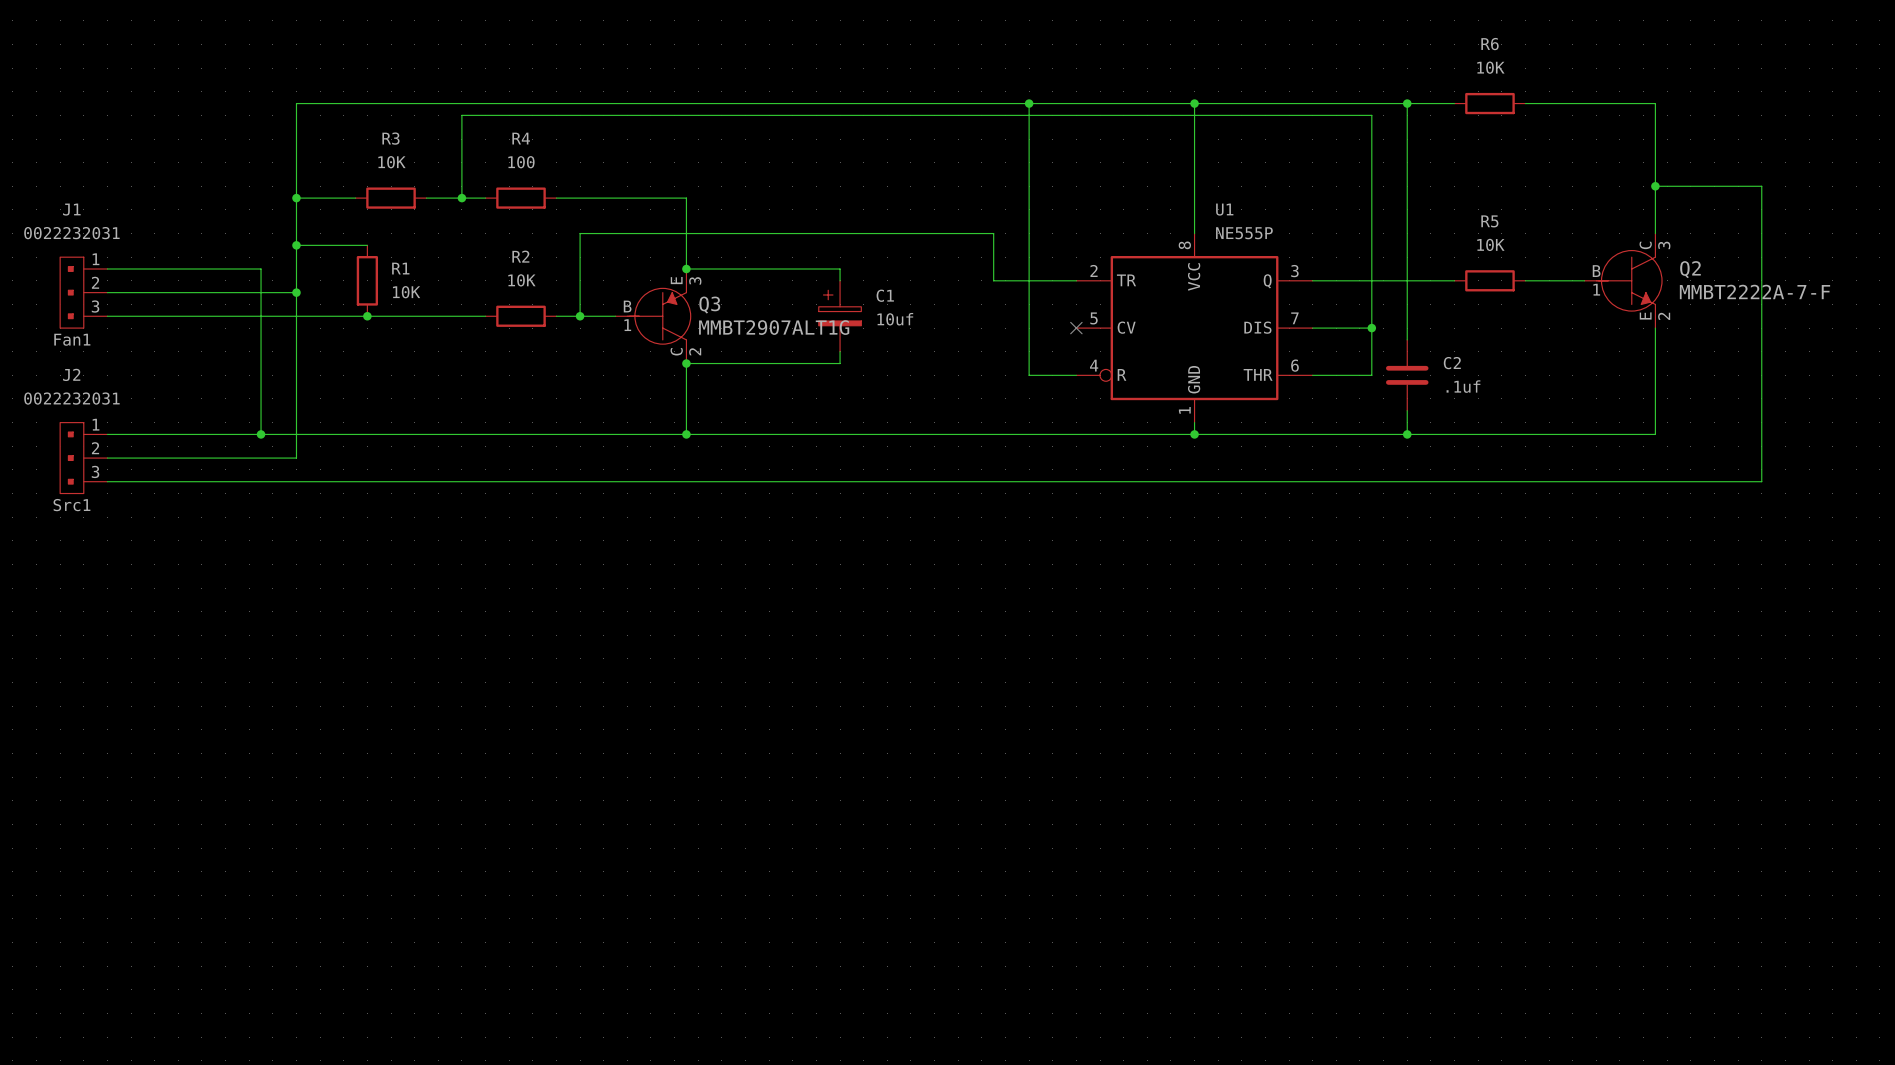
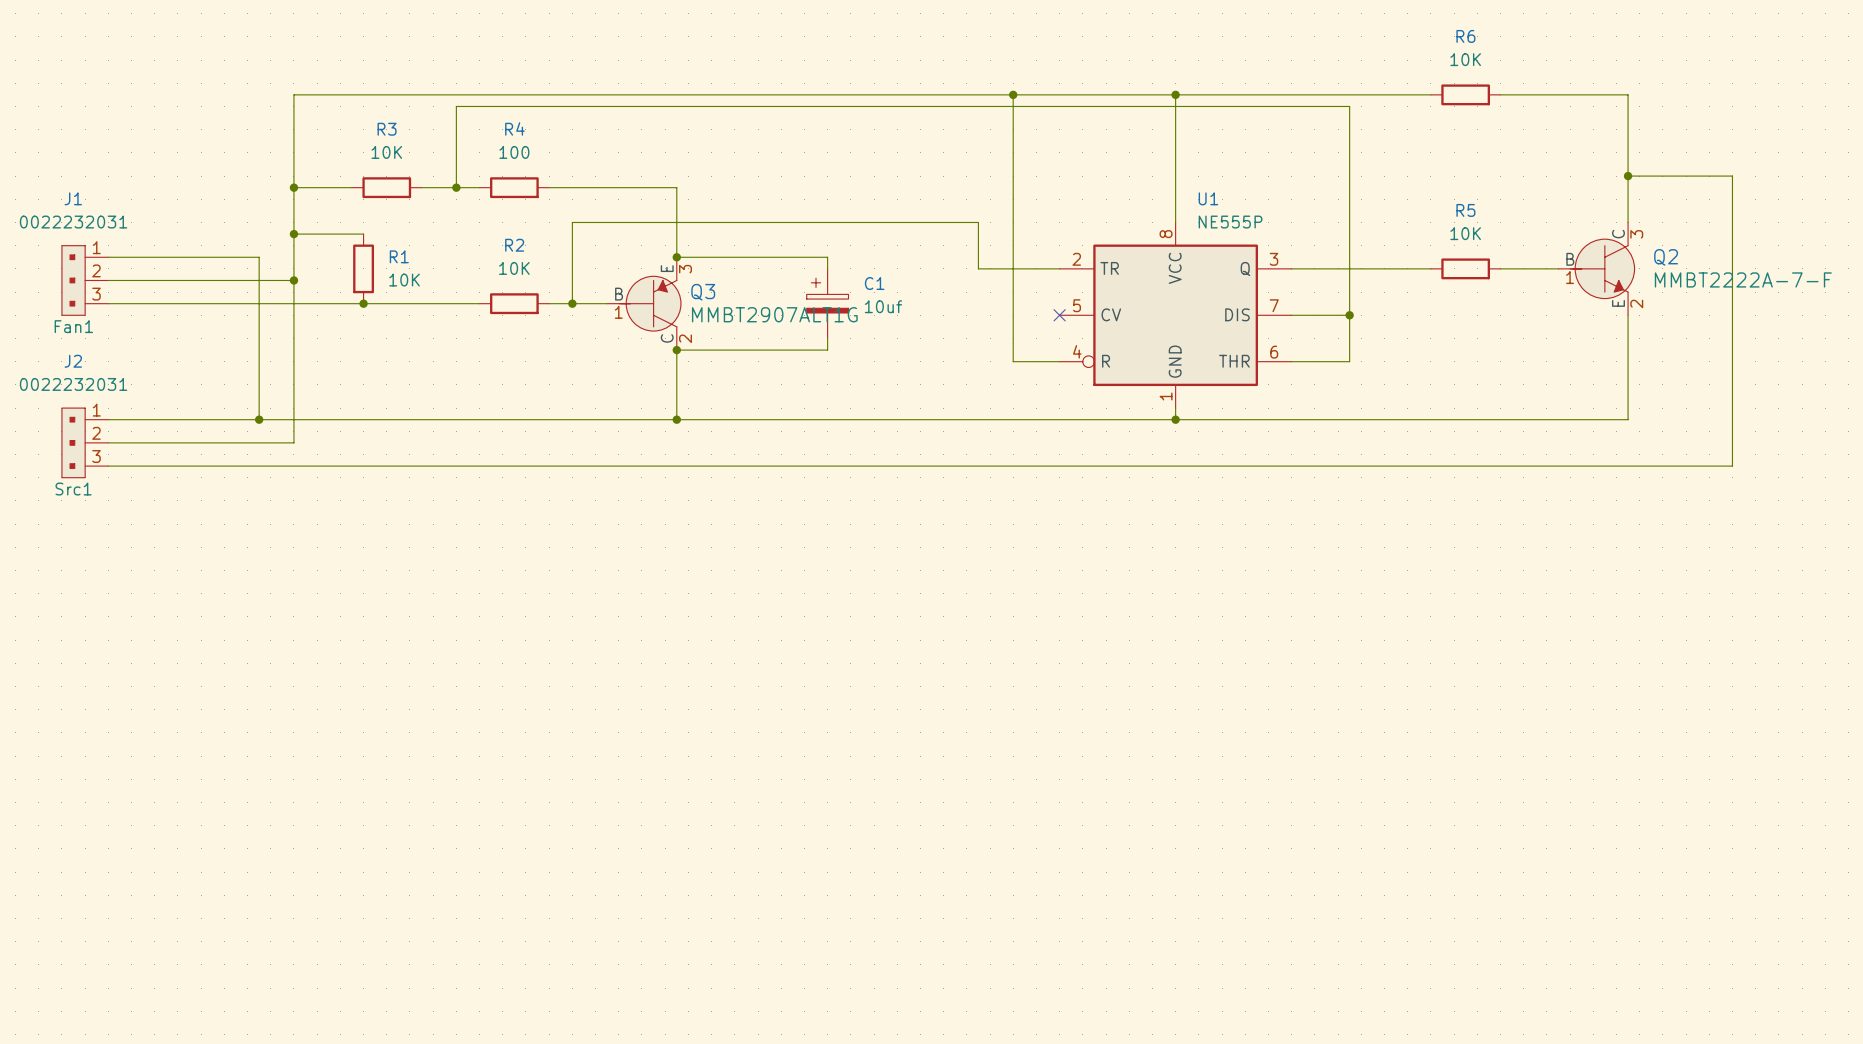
wire: (1407, 103) (1407, 339) -> none
junction: (1407, 103) -> none
C2: .1uf (1407, 375) -> none
wire: (1407, 410) (1407, 434) -> none
junction: (1407, 434) -> none

